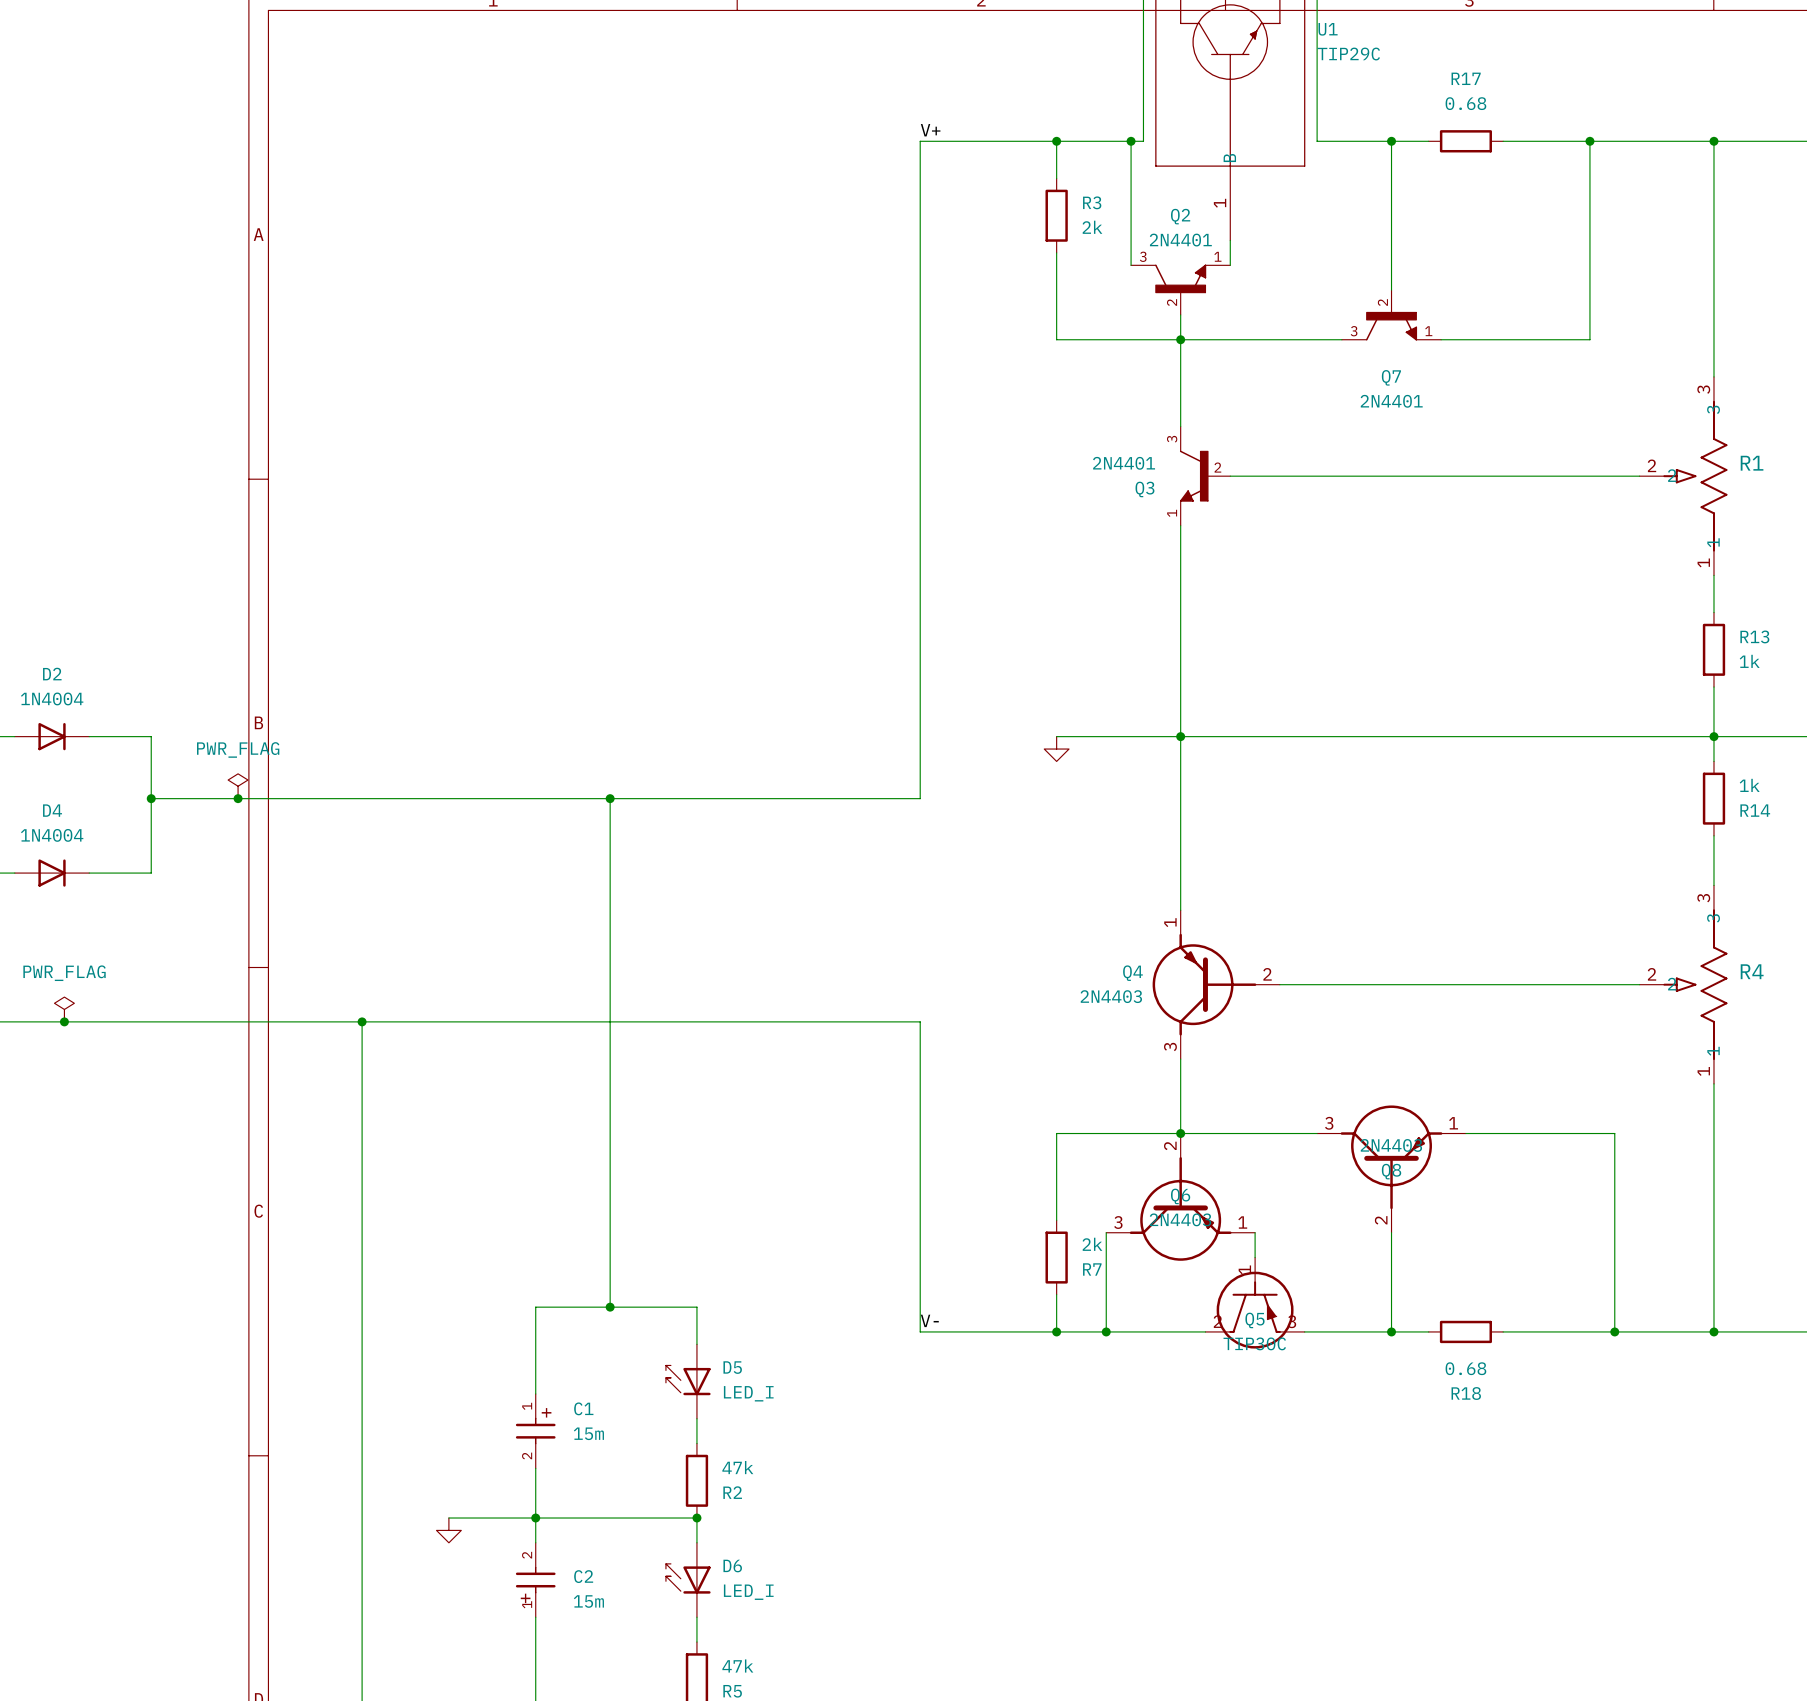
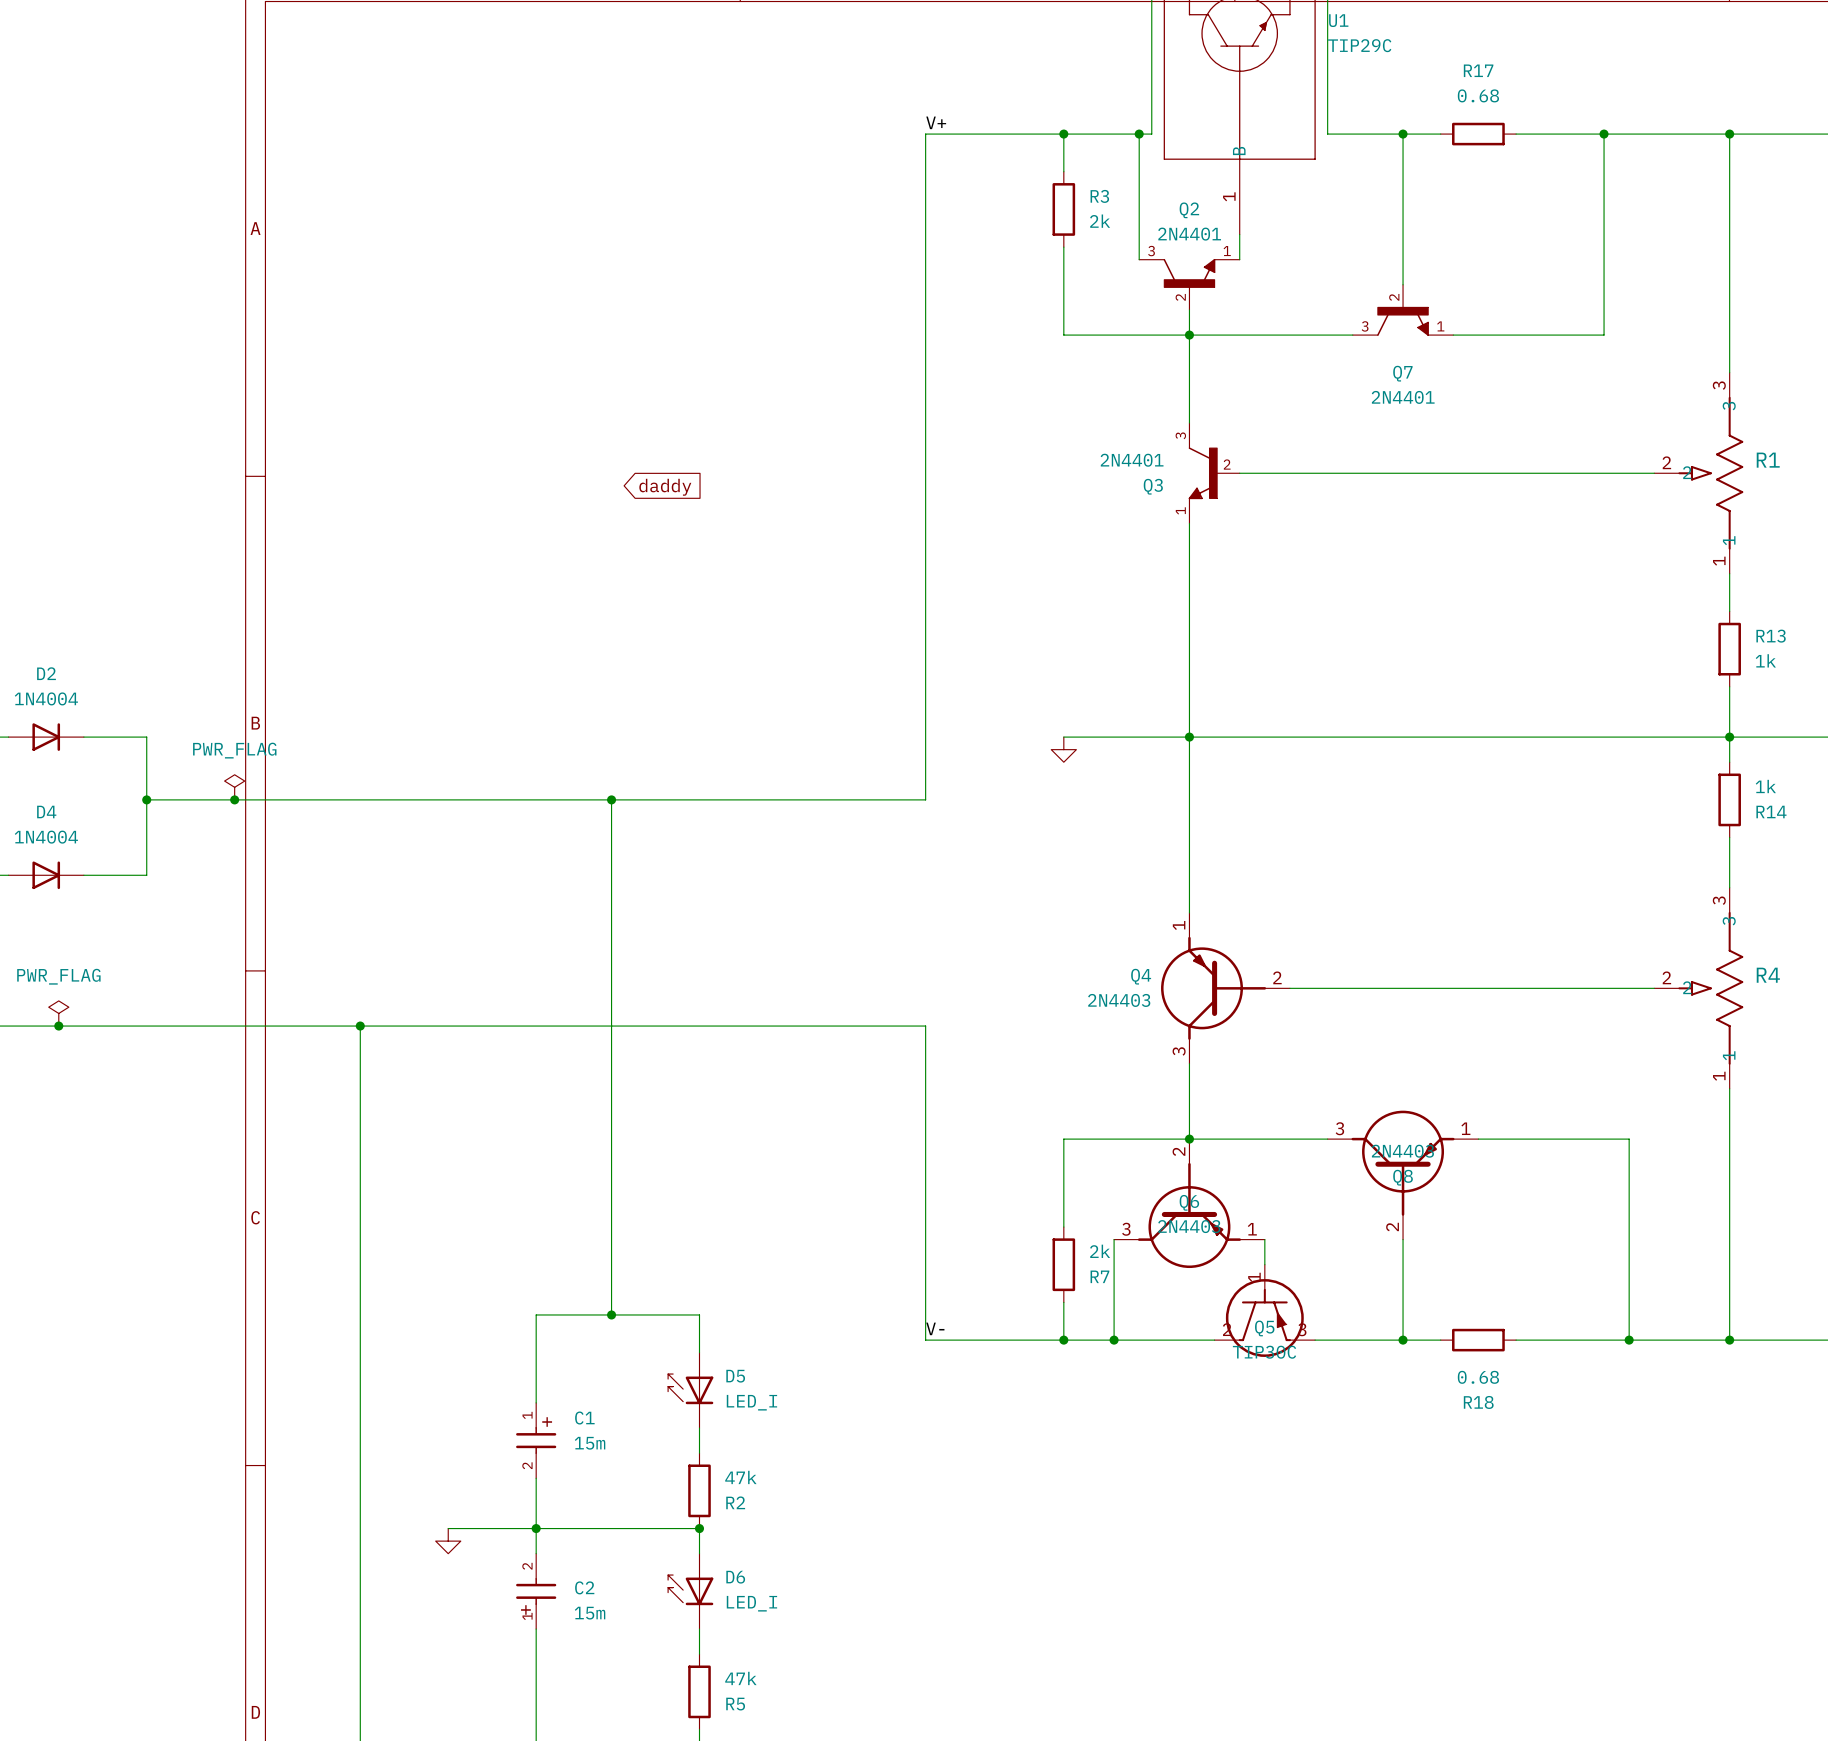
global label: none -> daddy (665, 487)

